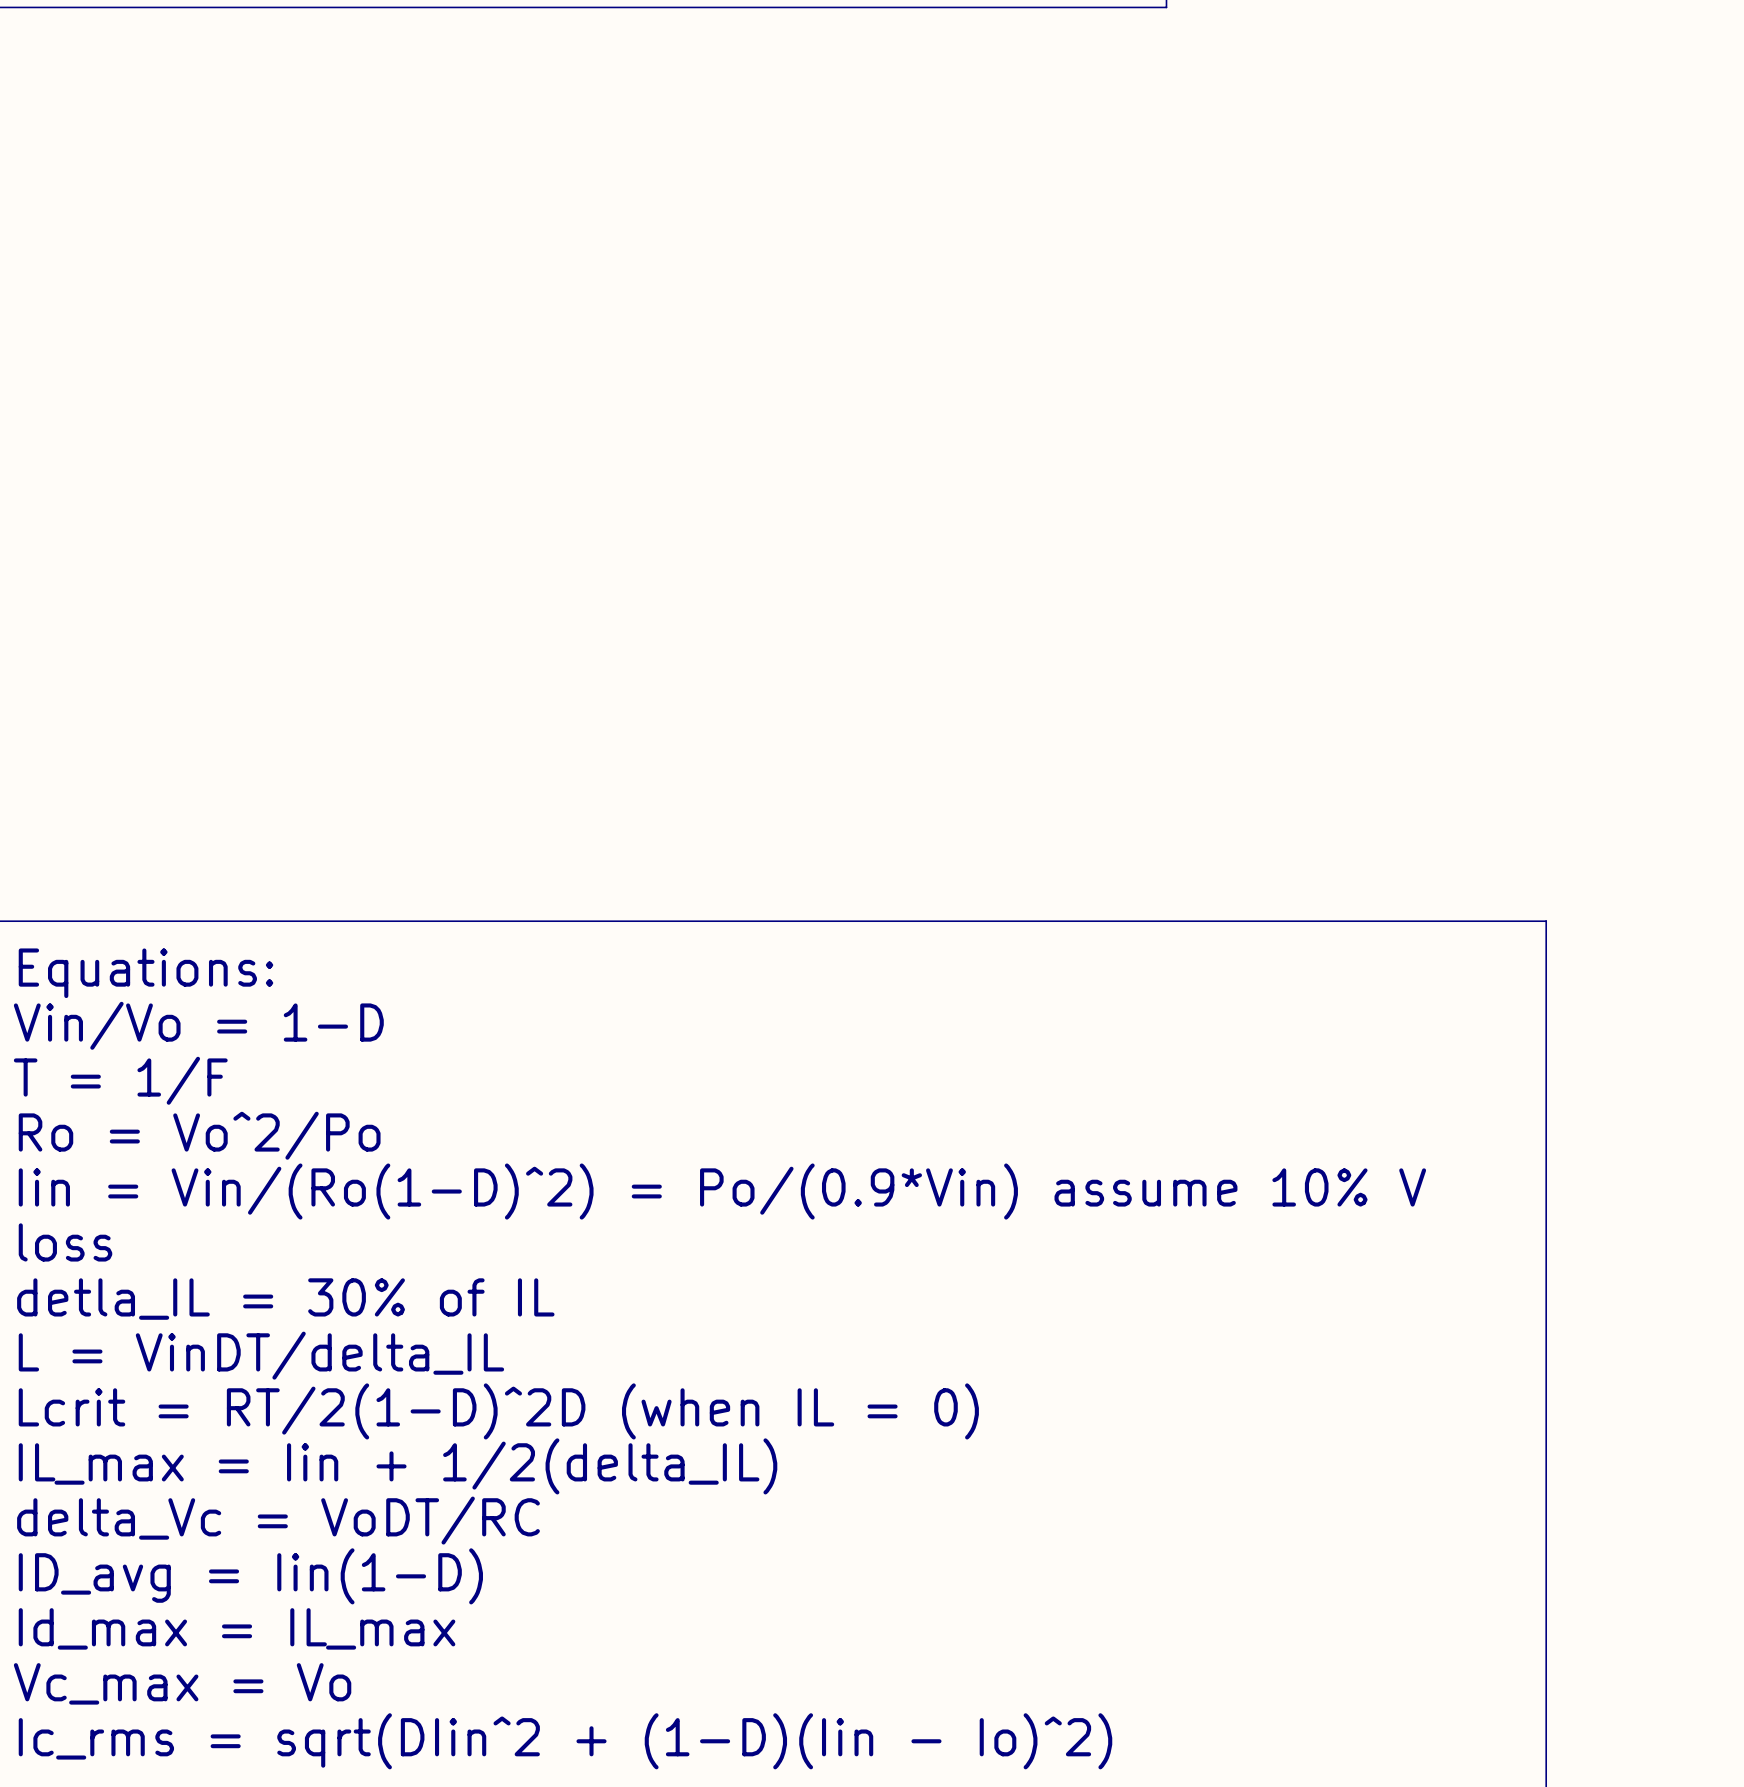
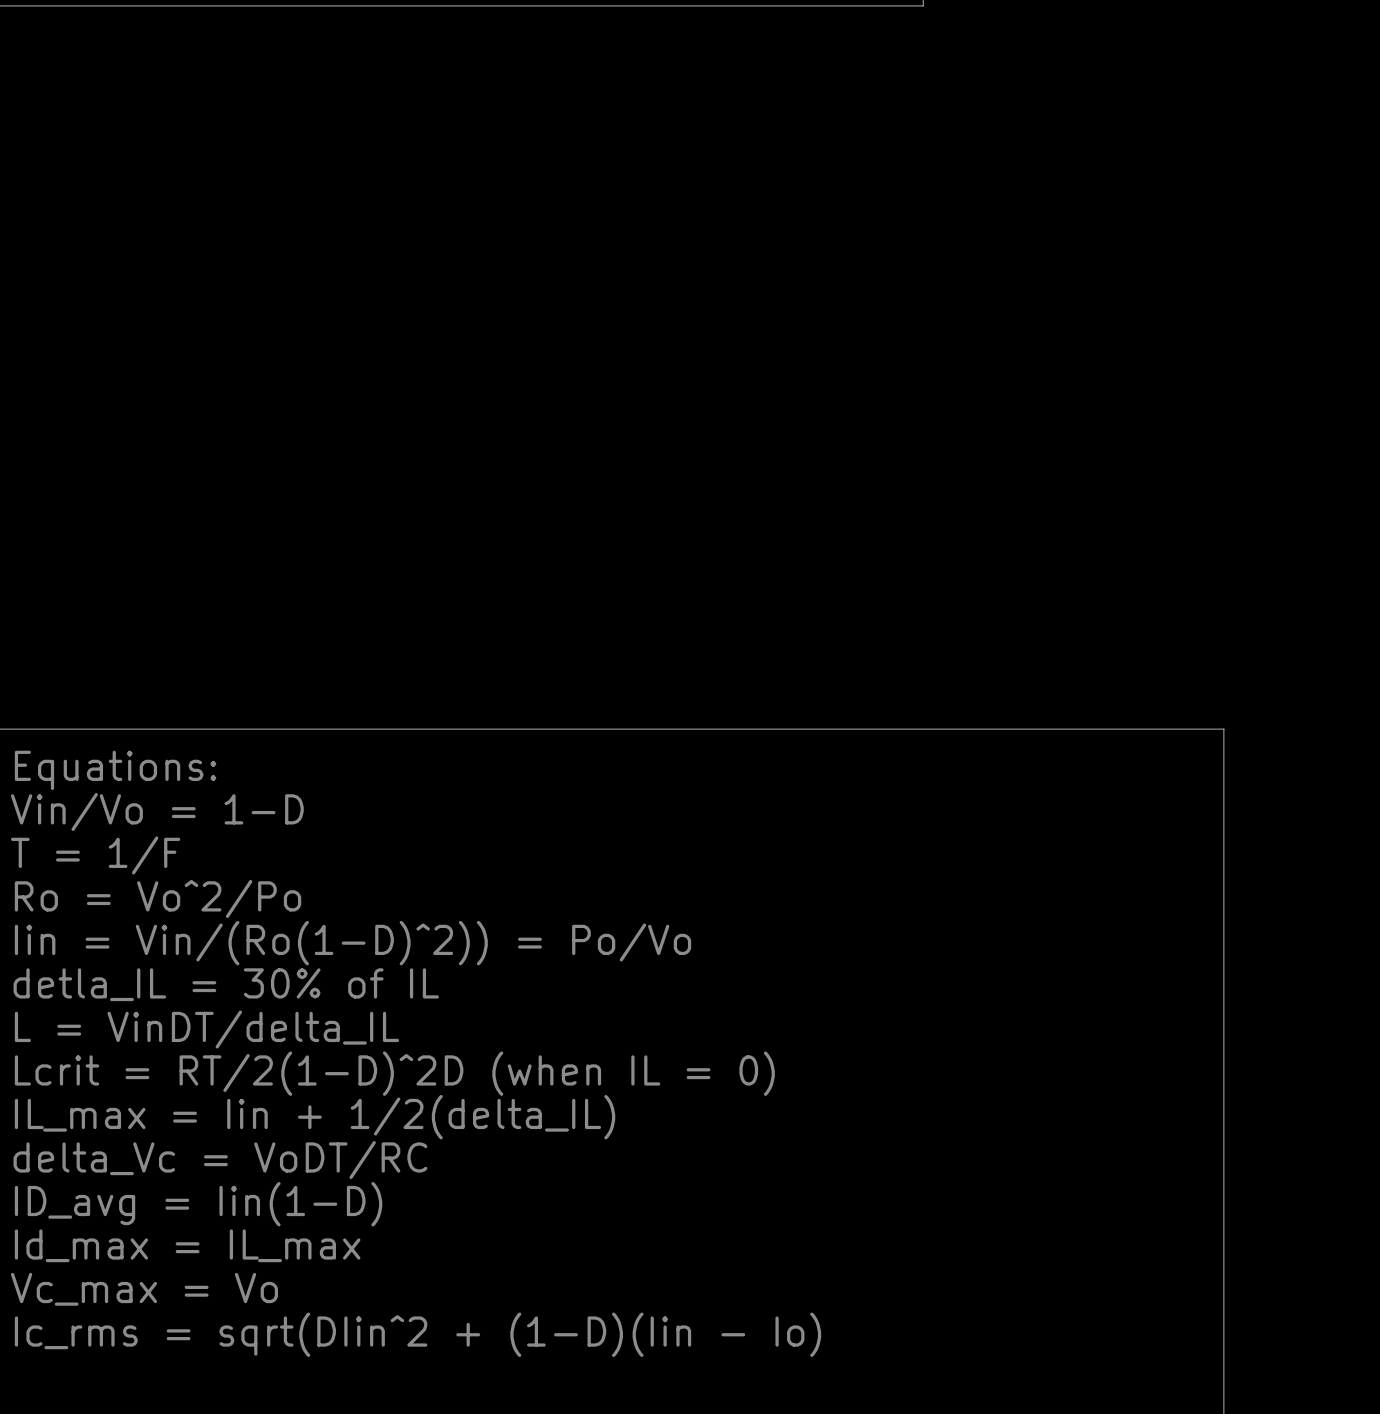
text: Iin = Vin/(Ro(1-D)^2) = Po/(0.9*Vin) assume 10% V (722, 1191) -> Iin = Vin/(Ro(1-D)^2)) = Po/Vo (353, 943)
text: loss (65, 1242) -> detla_IL = 30% of IL (226, 984)
text: detla_IL = 30% of IL (285, 1299) -> L = VinDT/delta_IL (206, 1029)
text: L = VinDT/delta_IL (261, 1355) -> Lcrit = RT/2(1-D)^2D (when IL = 0) (394, 1073)
text: Lcrit = RT/2(1-D)^2D (when IL = 0) (498, 1411) -> IL_max = Iin + 1/2(delta_IL) (315, 1117)
text: IL_max = Iin + 1/2(delta_IL) (398, 1466) -> delta_Vc = VoDT/RC (220, 1160)
text: delta_Vc = VoDT/RC (278, 1520) -> ID_avg = Iin(1-D) (198, 1204)
text: ID_avg = Iin(1-D) (250, 1576) -> Id_max = IL_max (187, 1245)
text: Id_max = IL_max (237, 1628) -> Vc_max = Vo (144, 1289)
text: Vc_max = Vo (182, 1683) -> Ic_rms = sqrt(DIin^2 + (1-D)(Iin - Io) (417, 1334)
text: Ic_rms = sqrt(DIin^2 + (1-D)(Iin - Io)^2) (565, 1741) -> none

